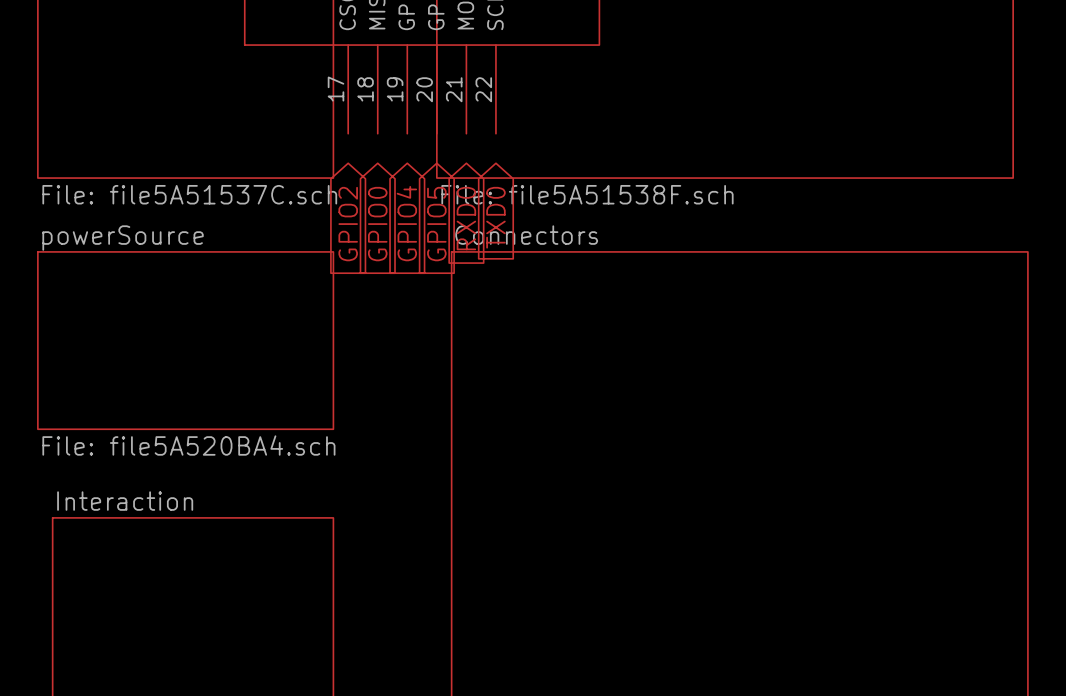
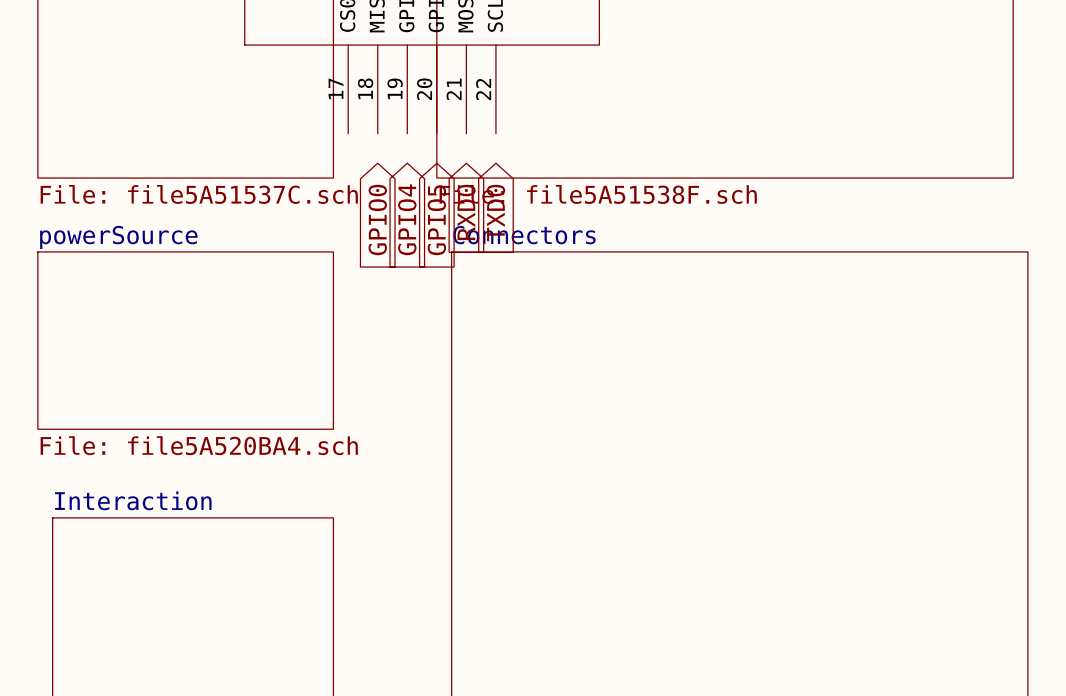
global label: GPIO2 (348, 224) -> none

